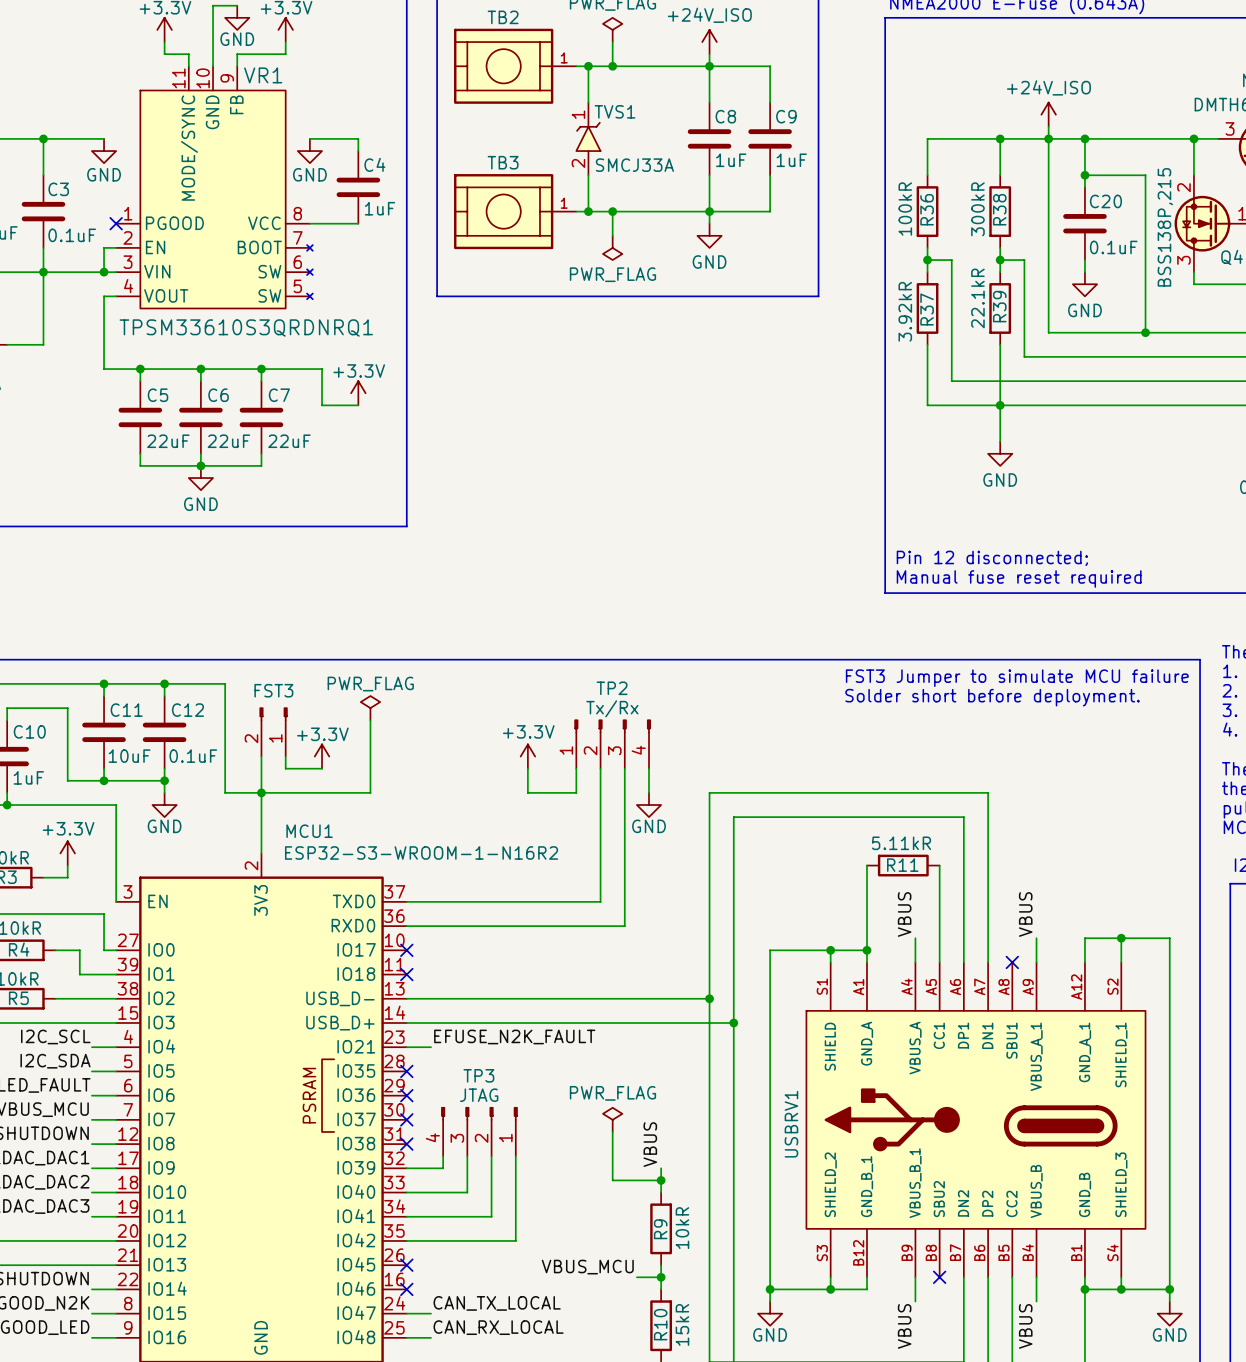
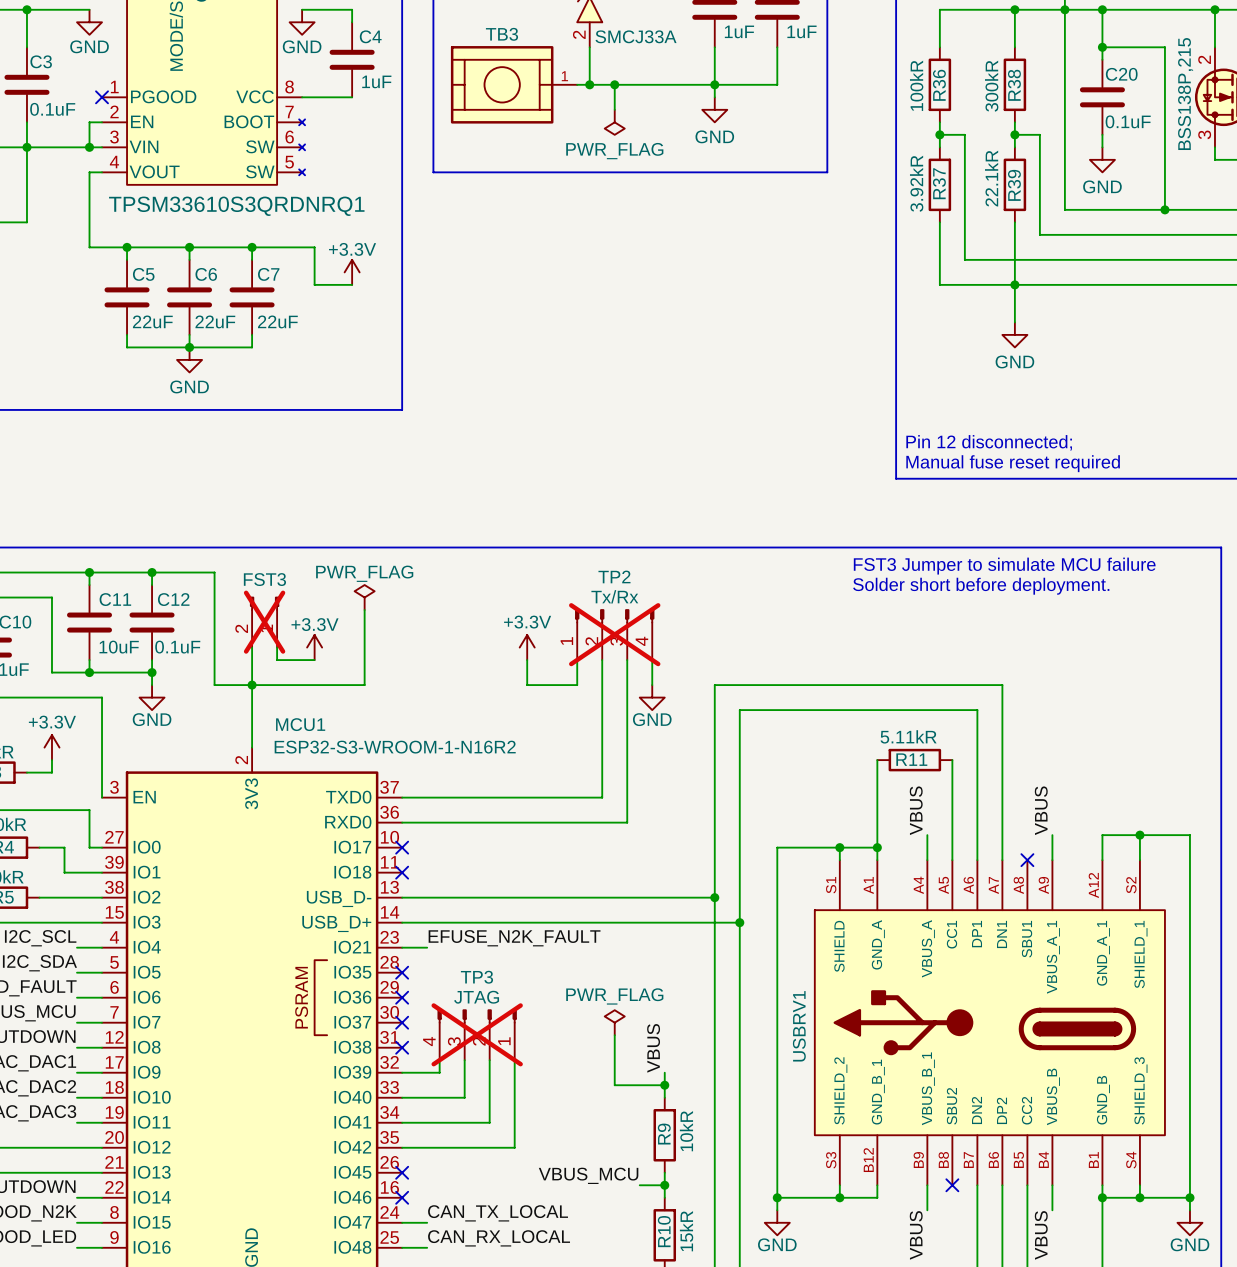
FST3 do-not-place cross: none -> (264, 622)
TP2 do-not-place cross: none -> (614, 634)
TP3 do-not-place cross: none -> (477, 1034)

